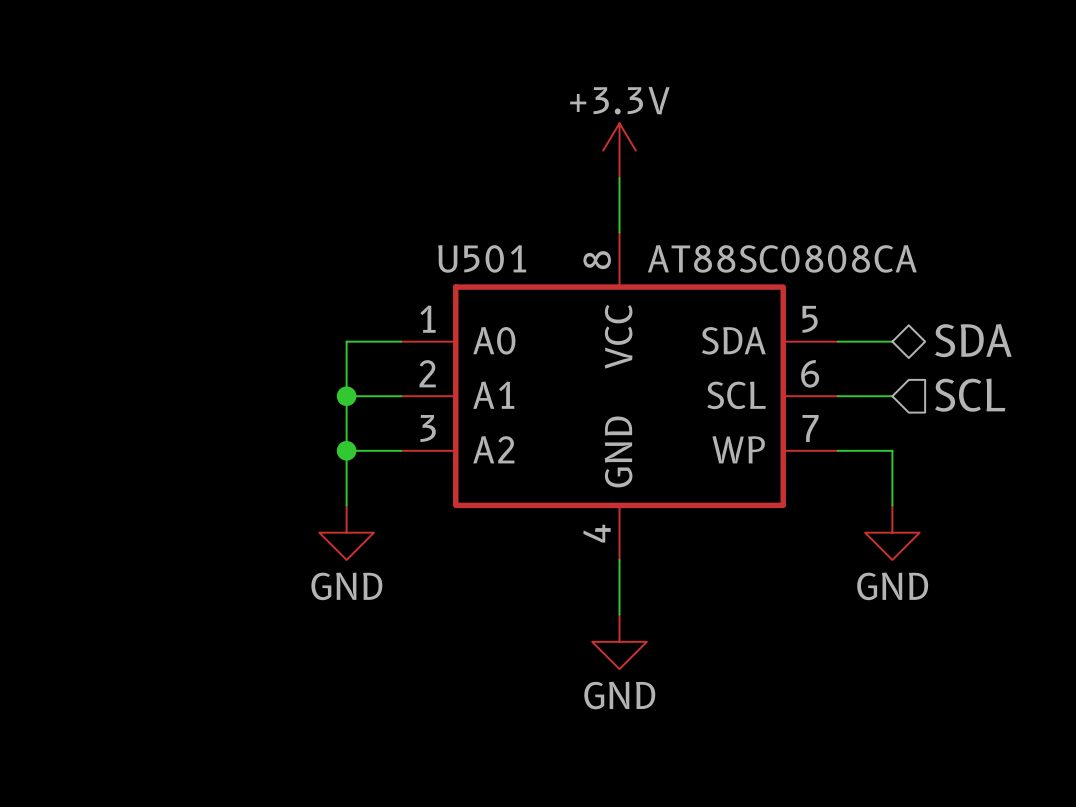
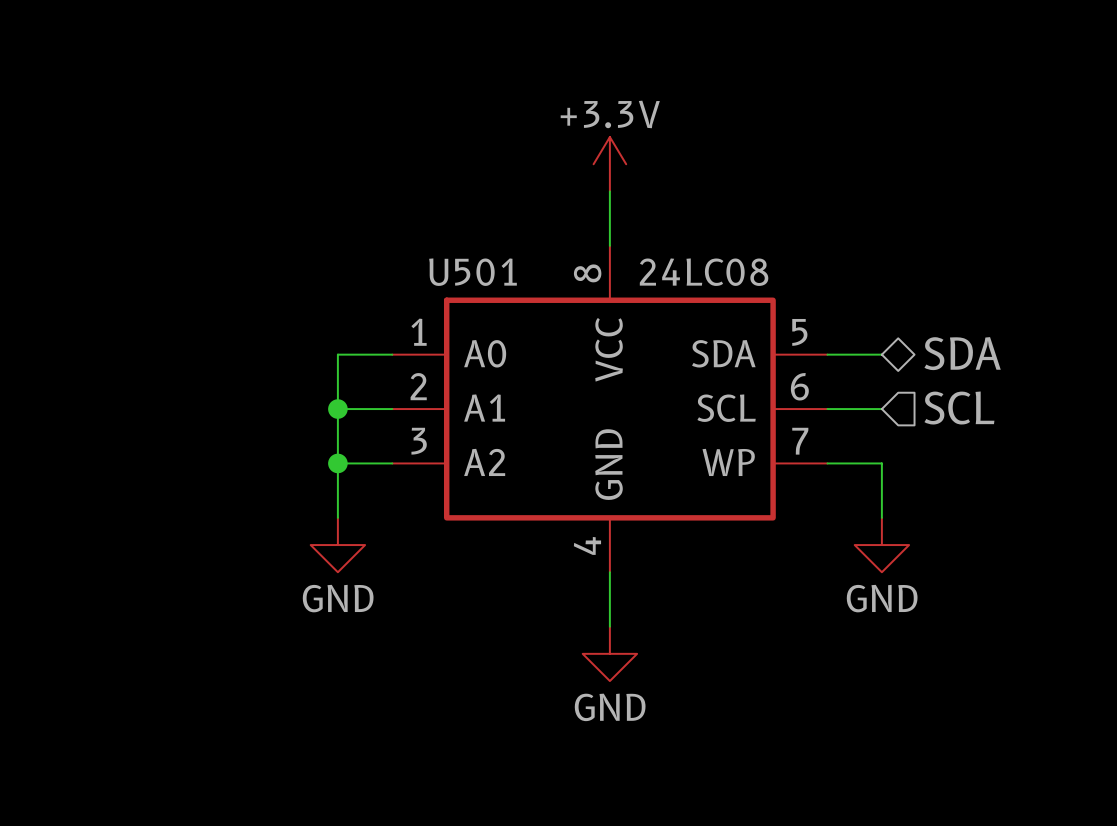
U501 value: AT88SC0808CA (782, 258) -> 24LC08 (704, 272)

